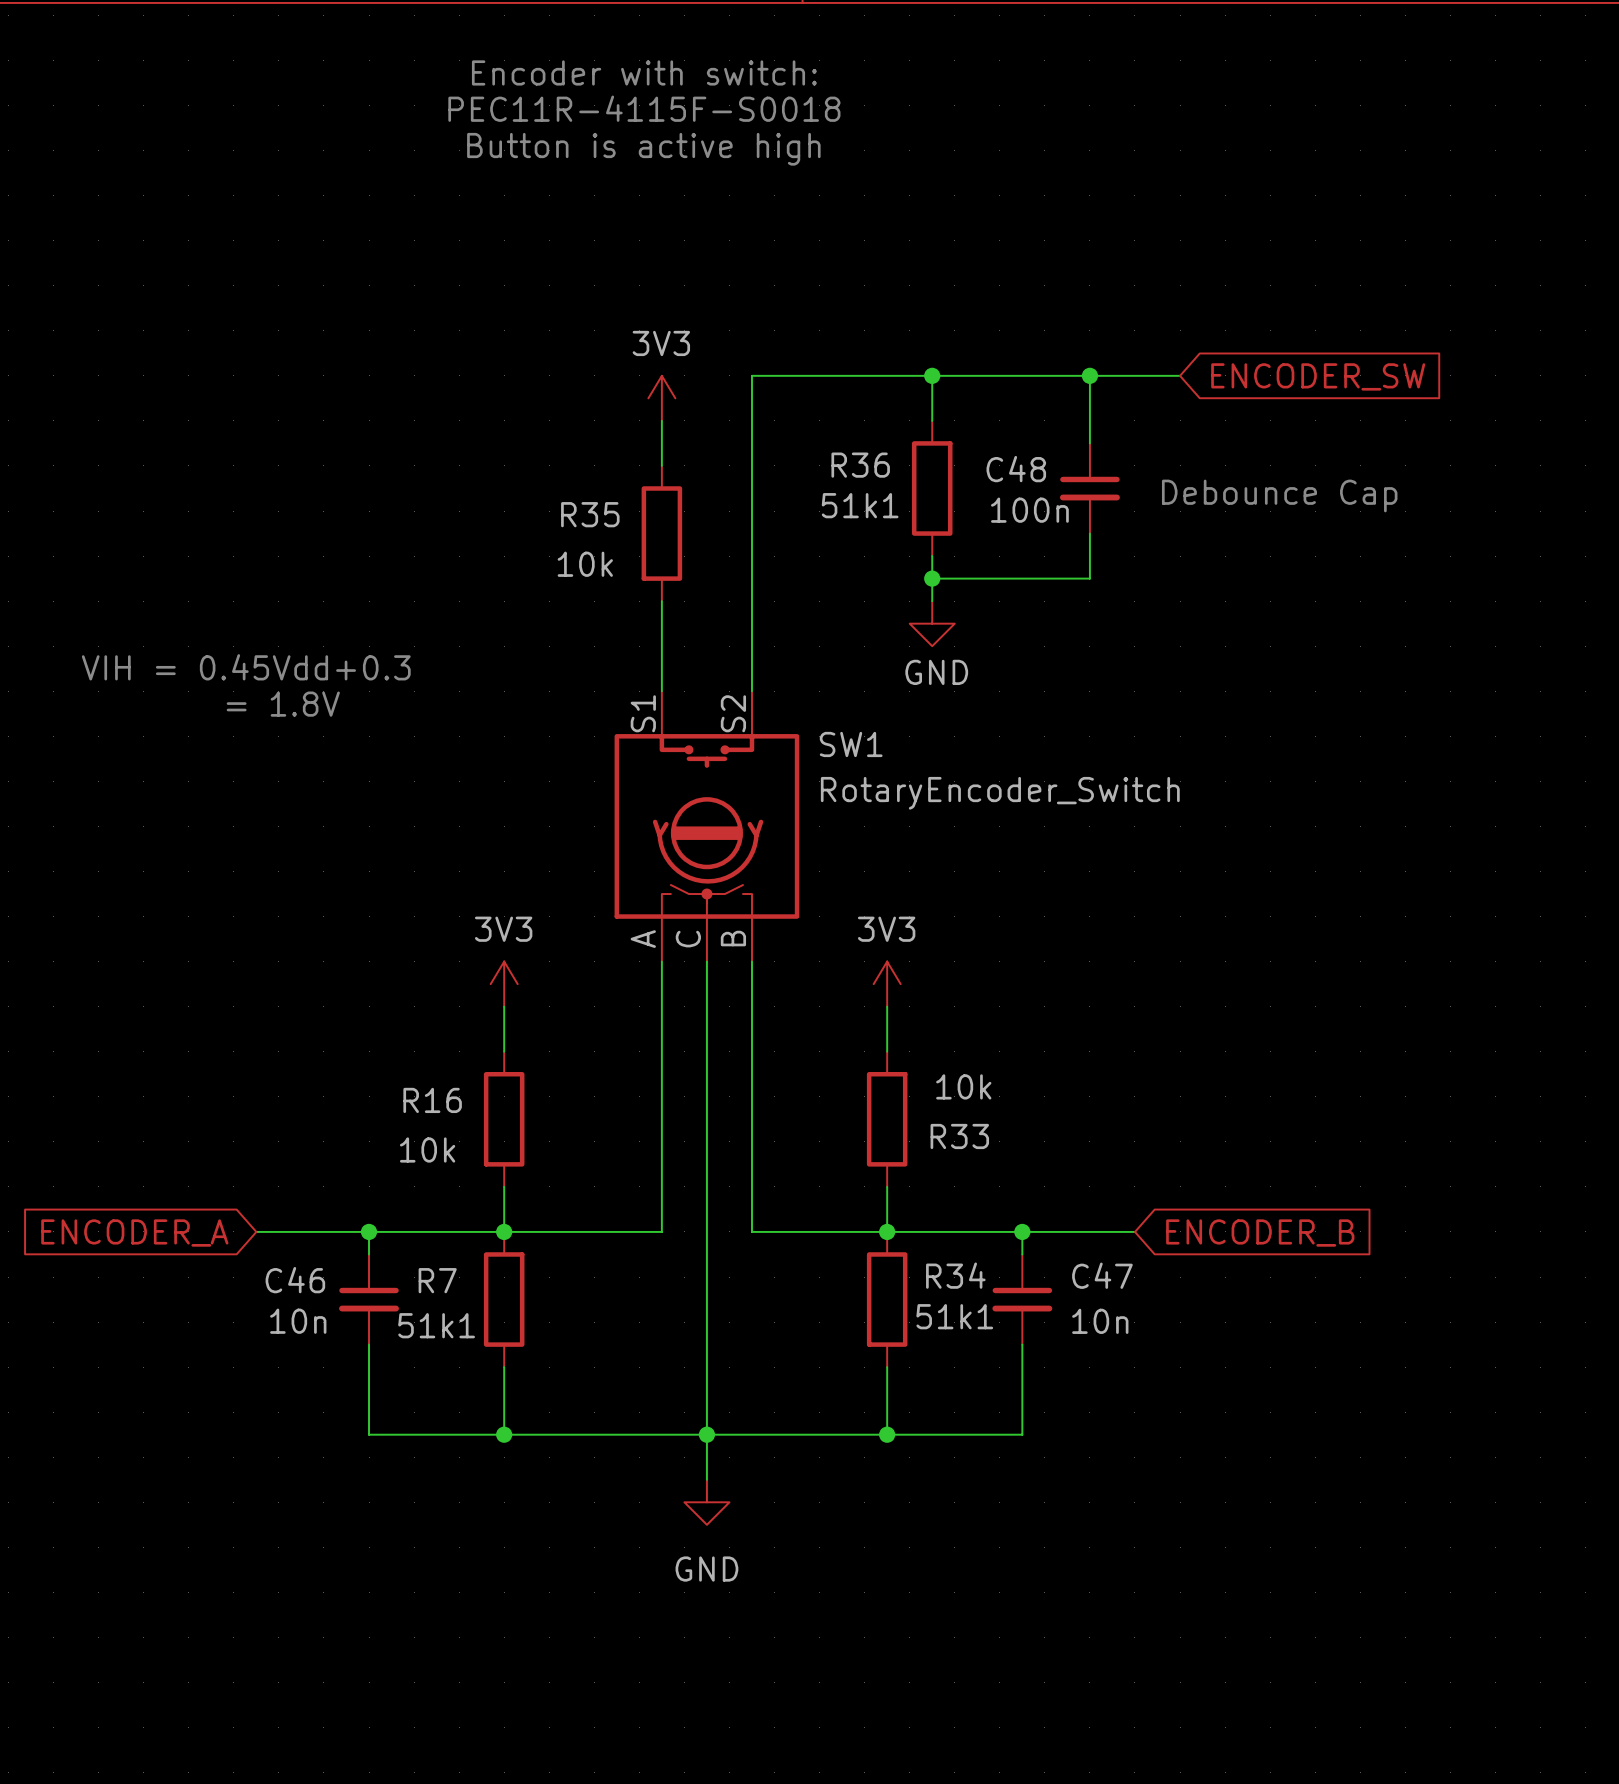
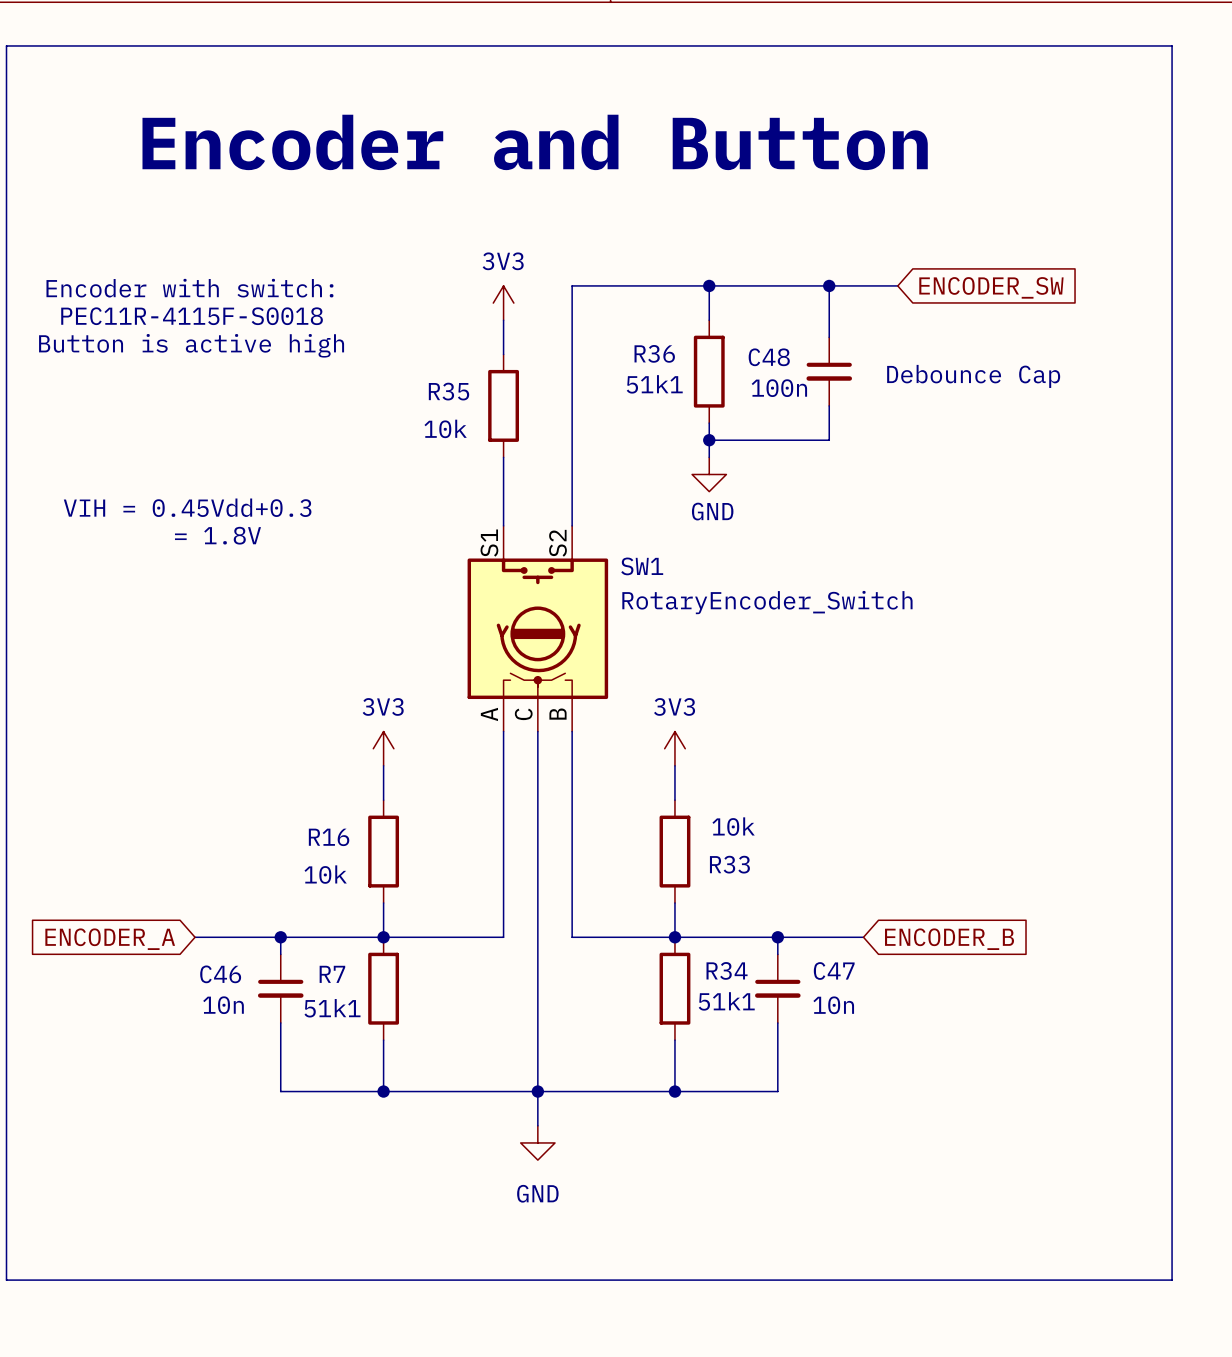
line: none -> (6, 45) (1172, 45) (1172, 1280) (6, 1280) (6, 45)
text: Encoder with switch: (644, 72) -> none
text: PEC11R-4115F-S0018 (644, 108) -> none
text: Button is active high (643, 149) -> none
text: none -> Encoder and Button (535, 142)
text: none -> Encoder with switch: (189, 288)
text: none -> PEC11R-4115F-S0018 (192, 316)
text: none -> Button is active high (191, 345)

